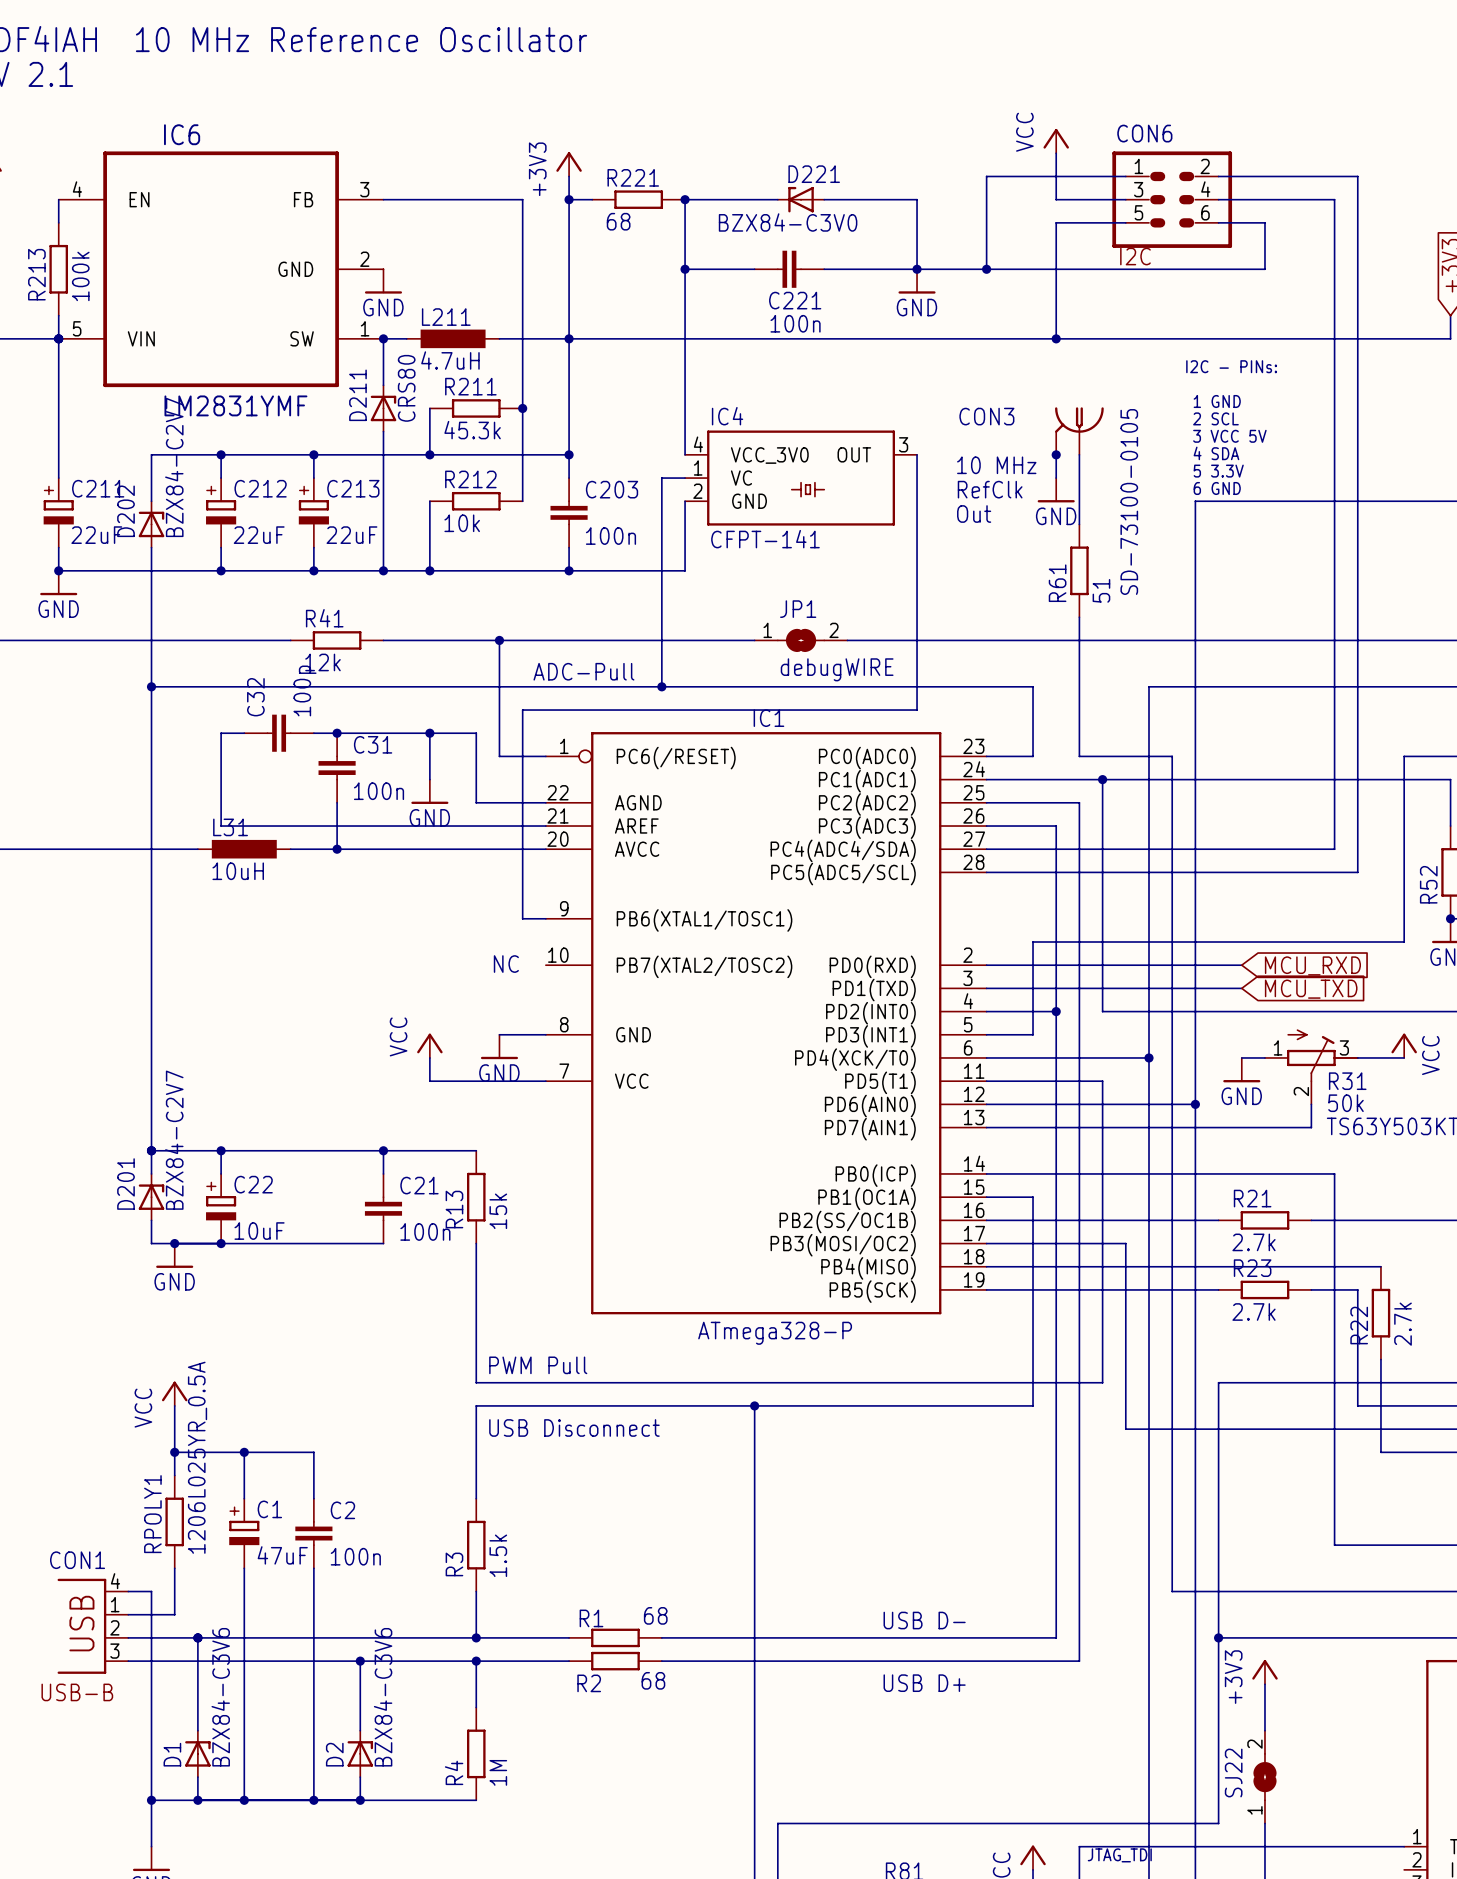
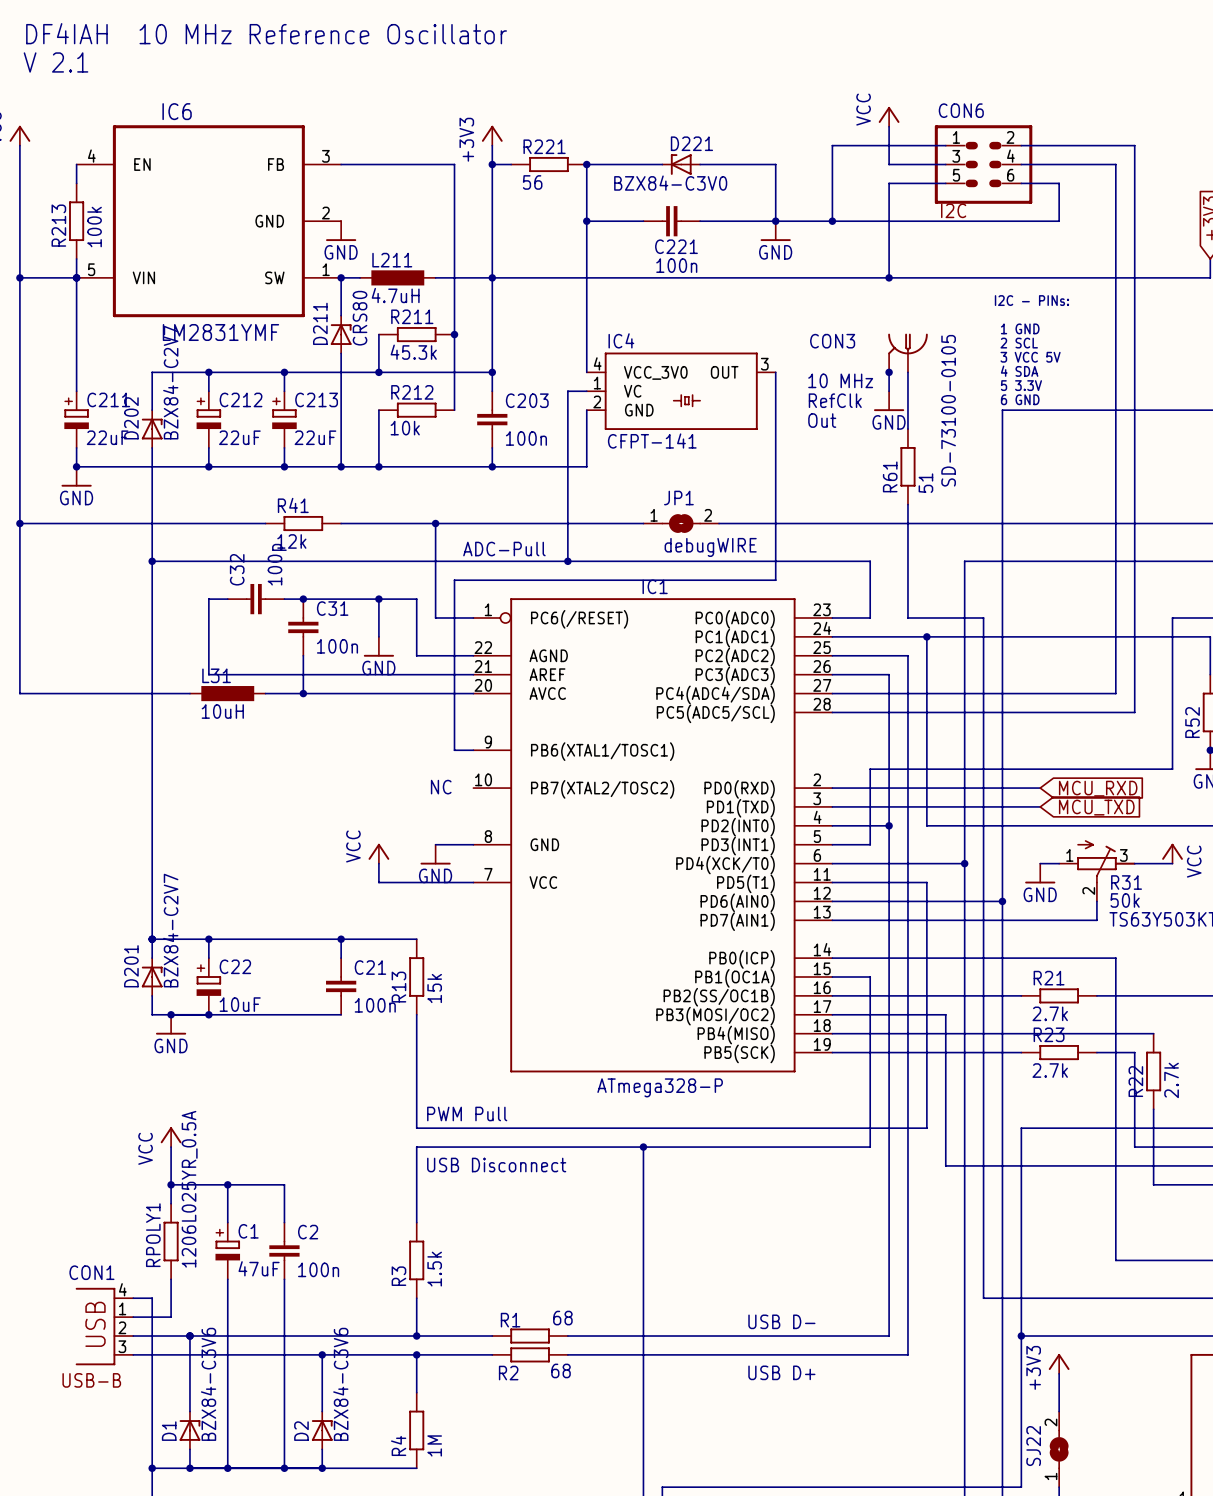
R221 value: 68 (618, 221) -> 56 (532, 182)

